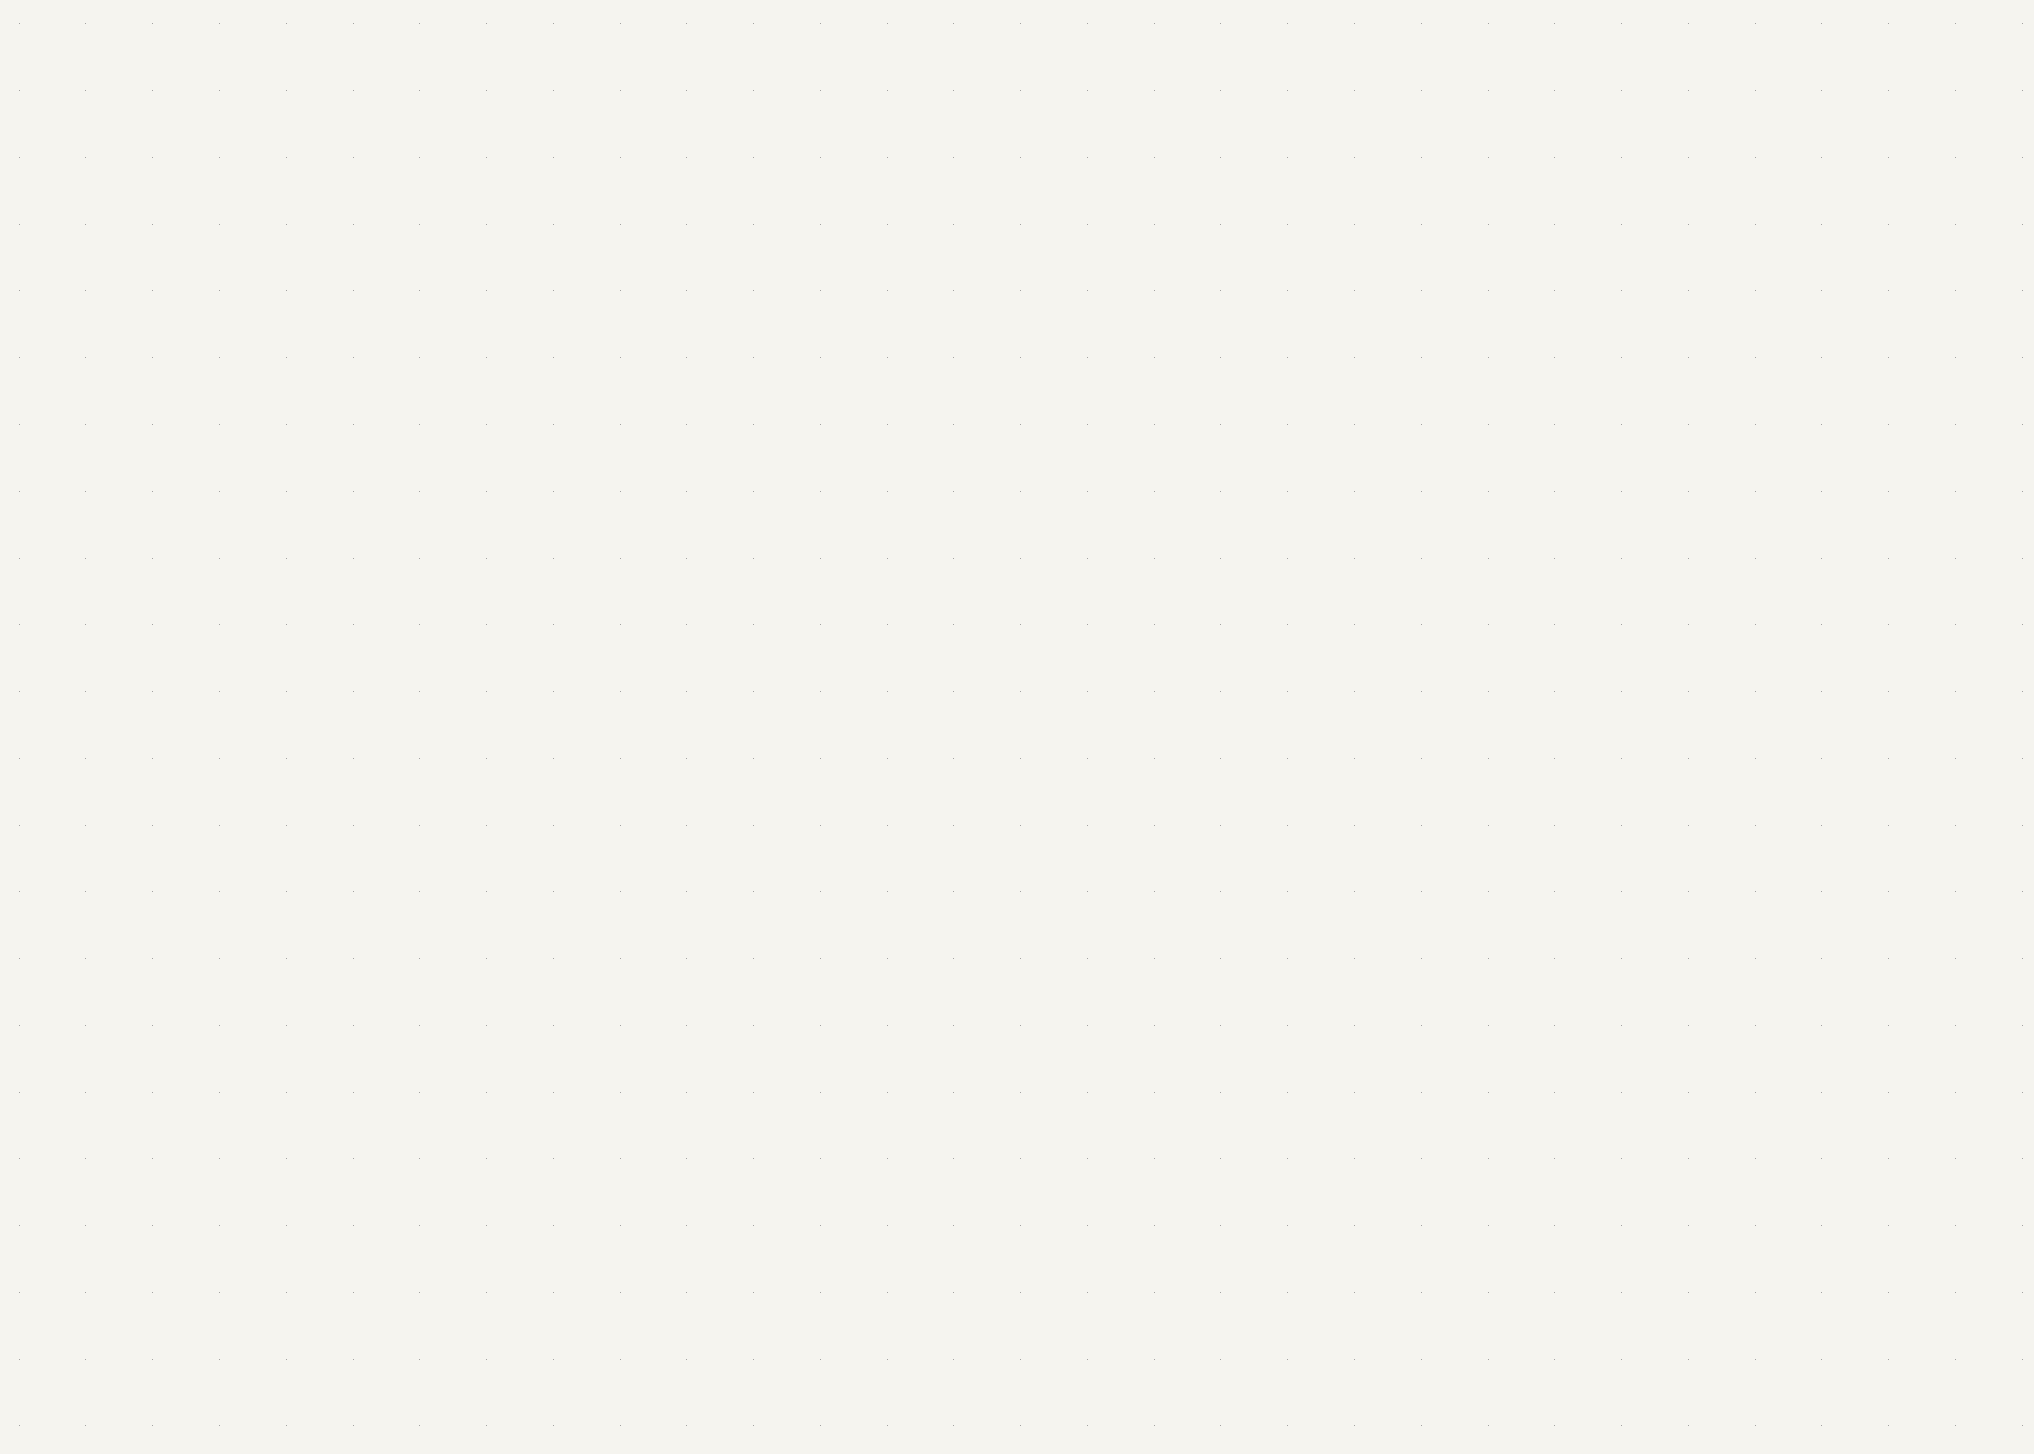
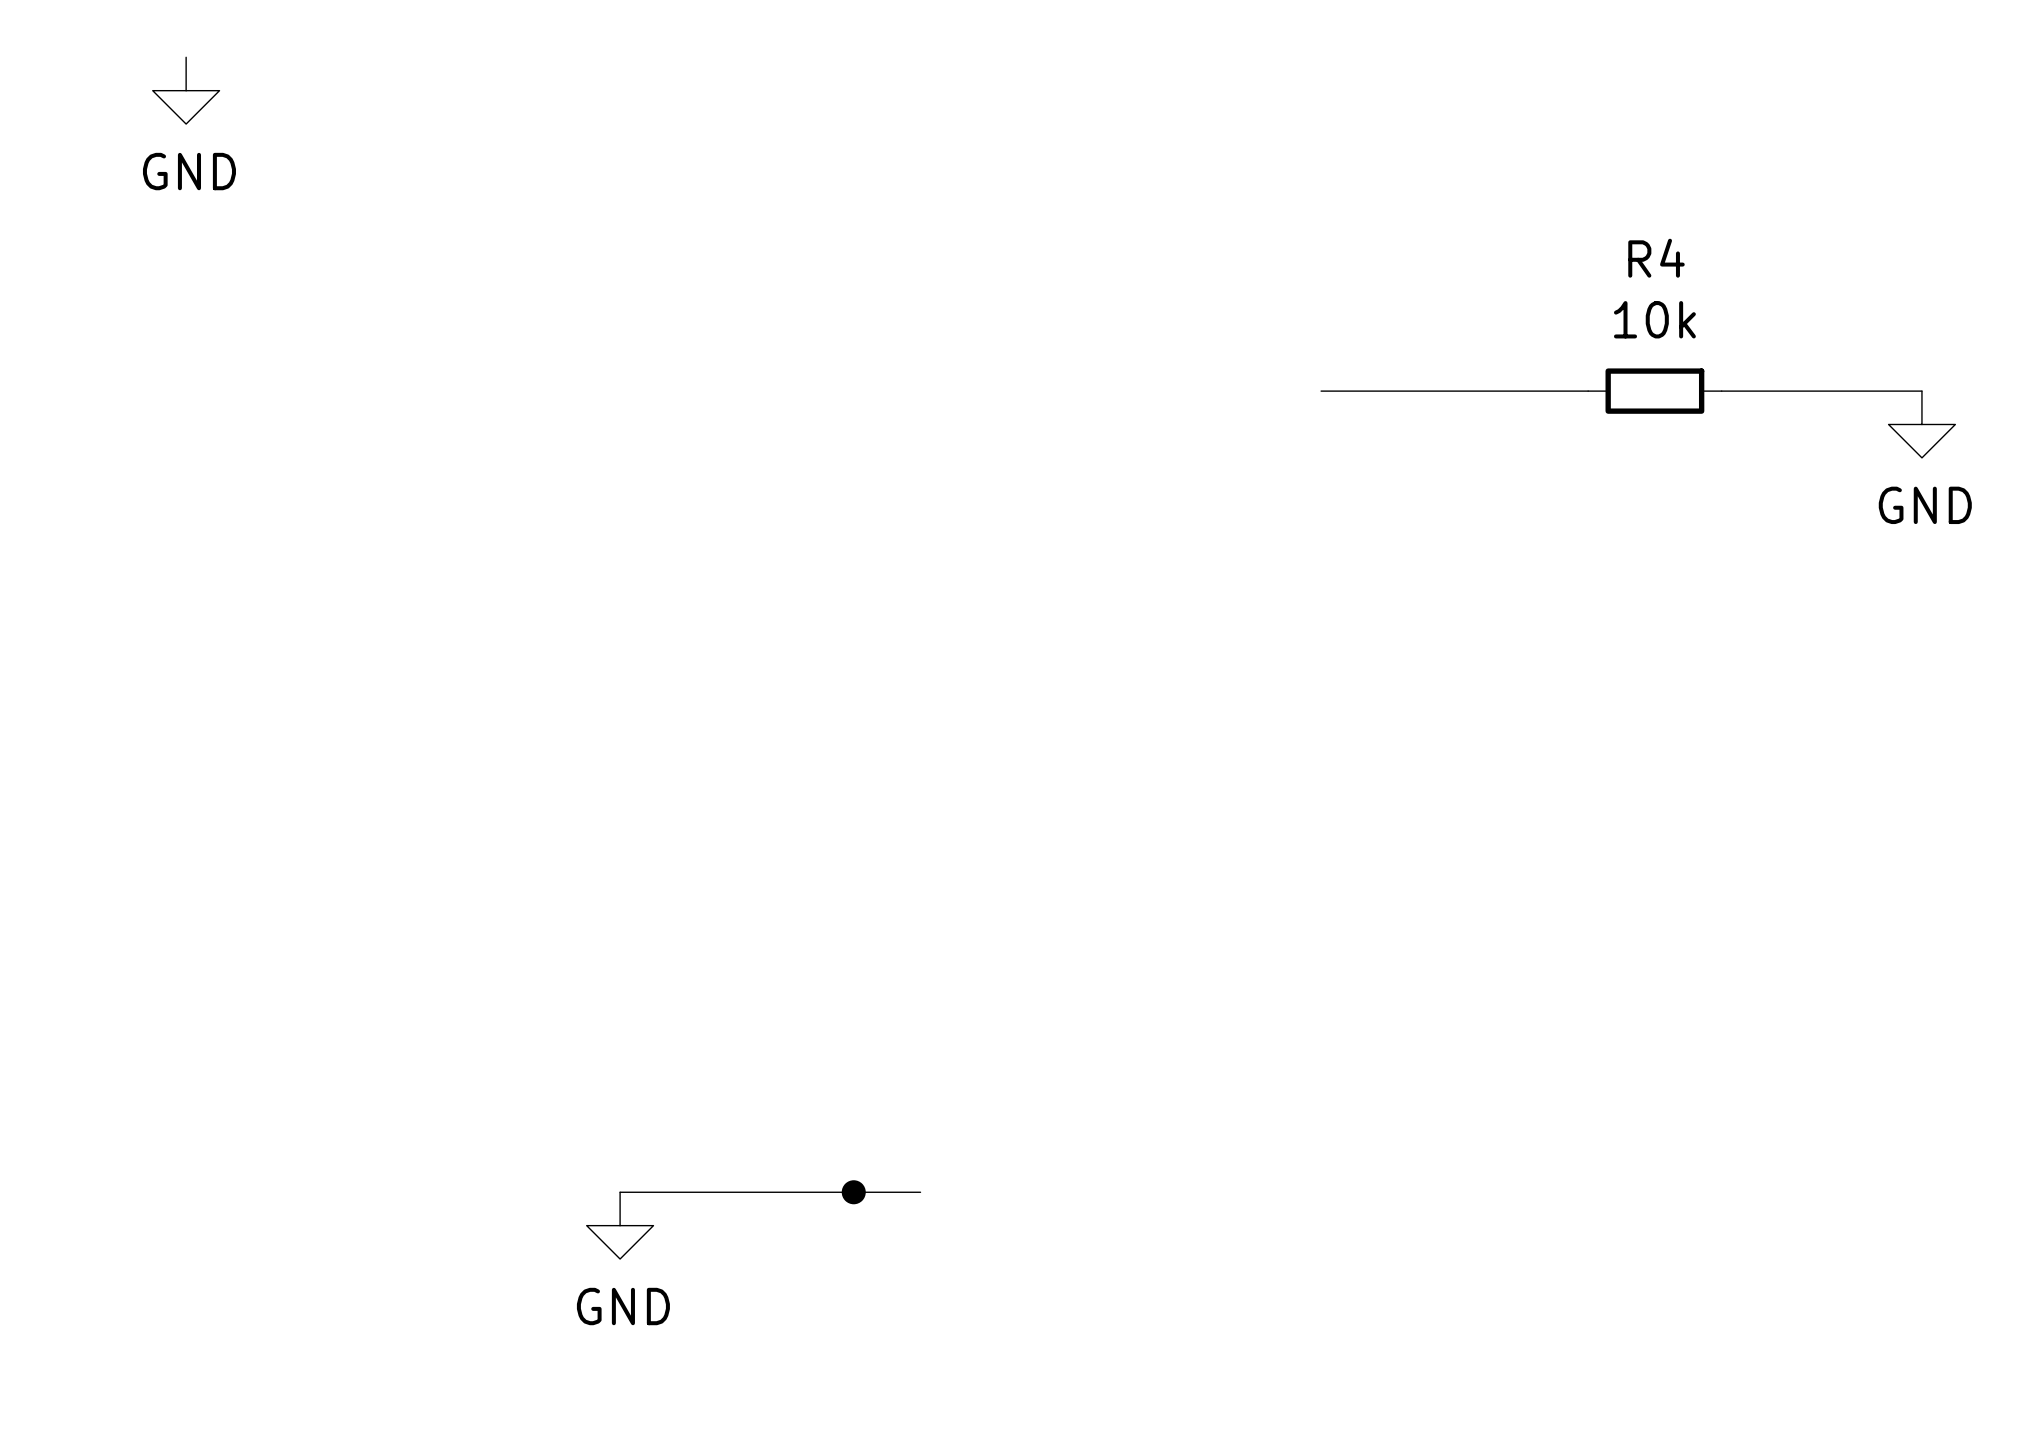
power symbol: none -> GND (186, 90)
wire: none -> (1321, 391) (1588, 391)
R4: none -> 10k (1654, 391)
wire: none -> (1721, 391) (1921, 391)
power symbol: none -> GND (1921, 424)
wire: none -> (620, 1192) (920, 1192)
junction: none -> (853, 1192)
power symbol: none -> GND (620, 1225)

